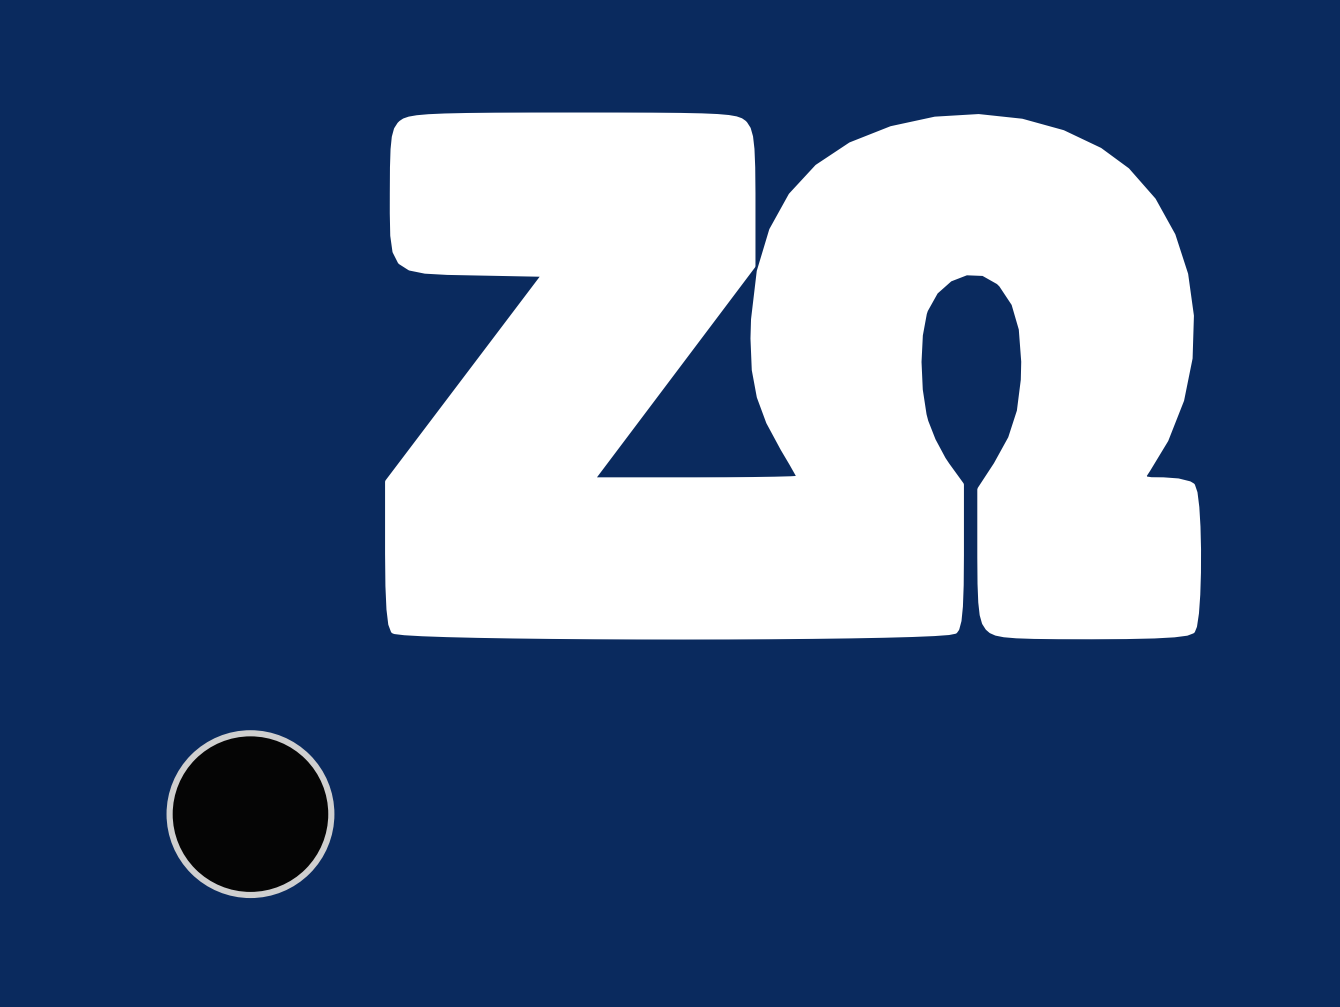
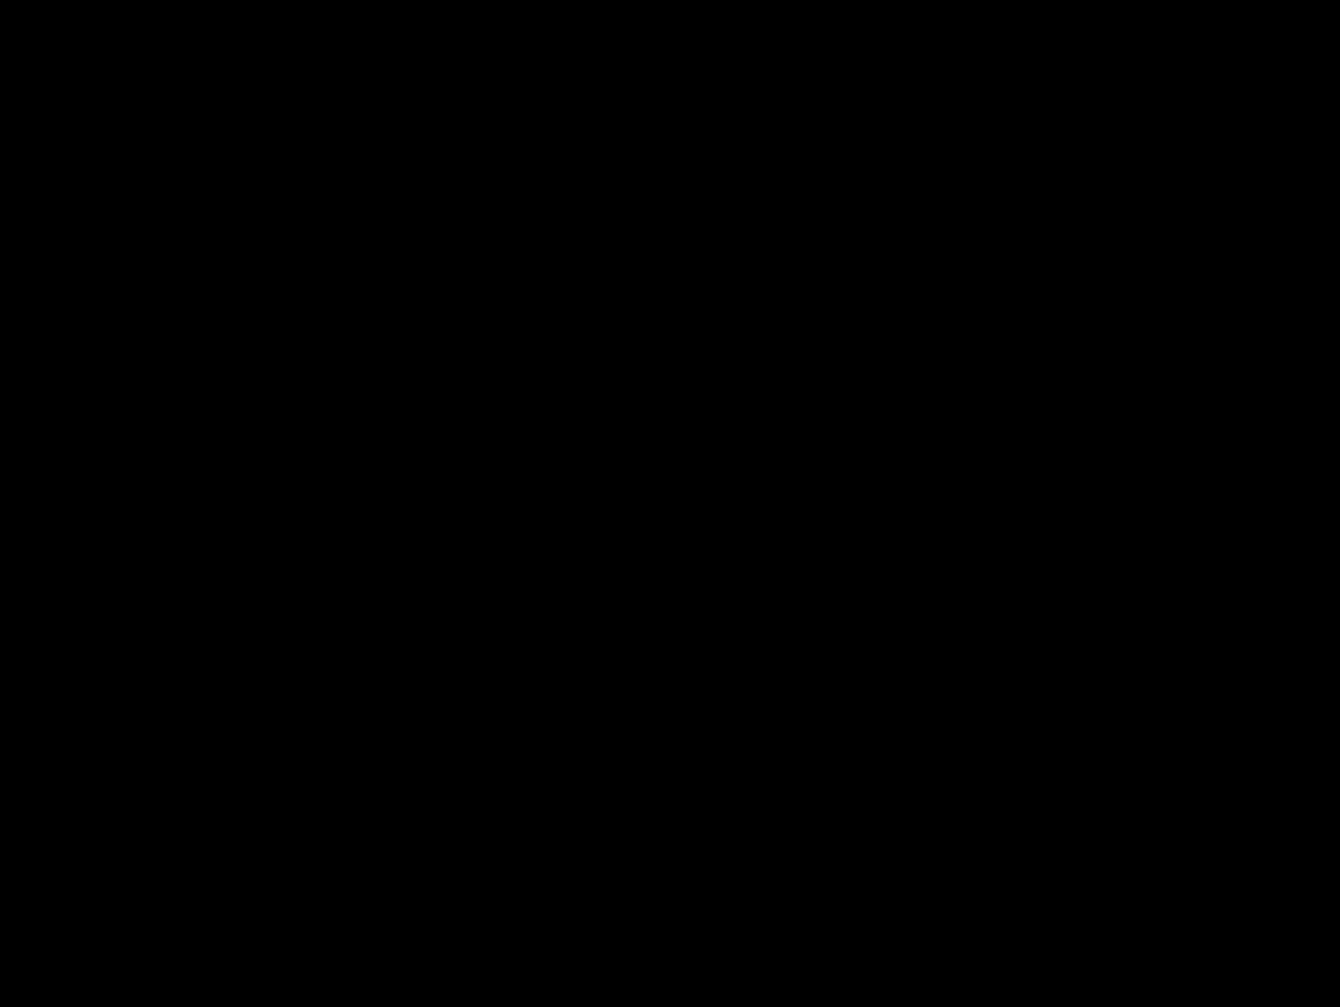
drawing: [385, 112, 1202, 640] -> none
part: (250, 814) -> none

